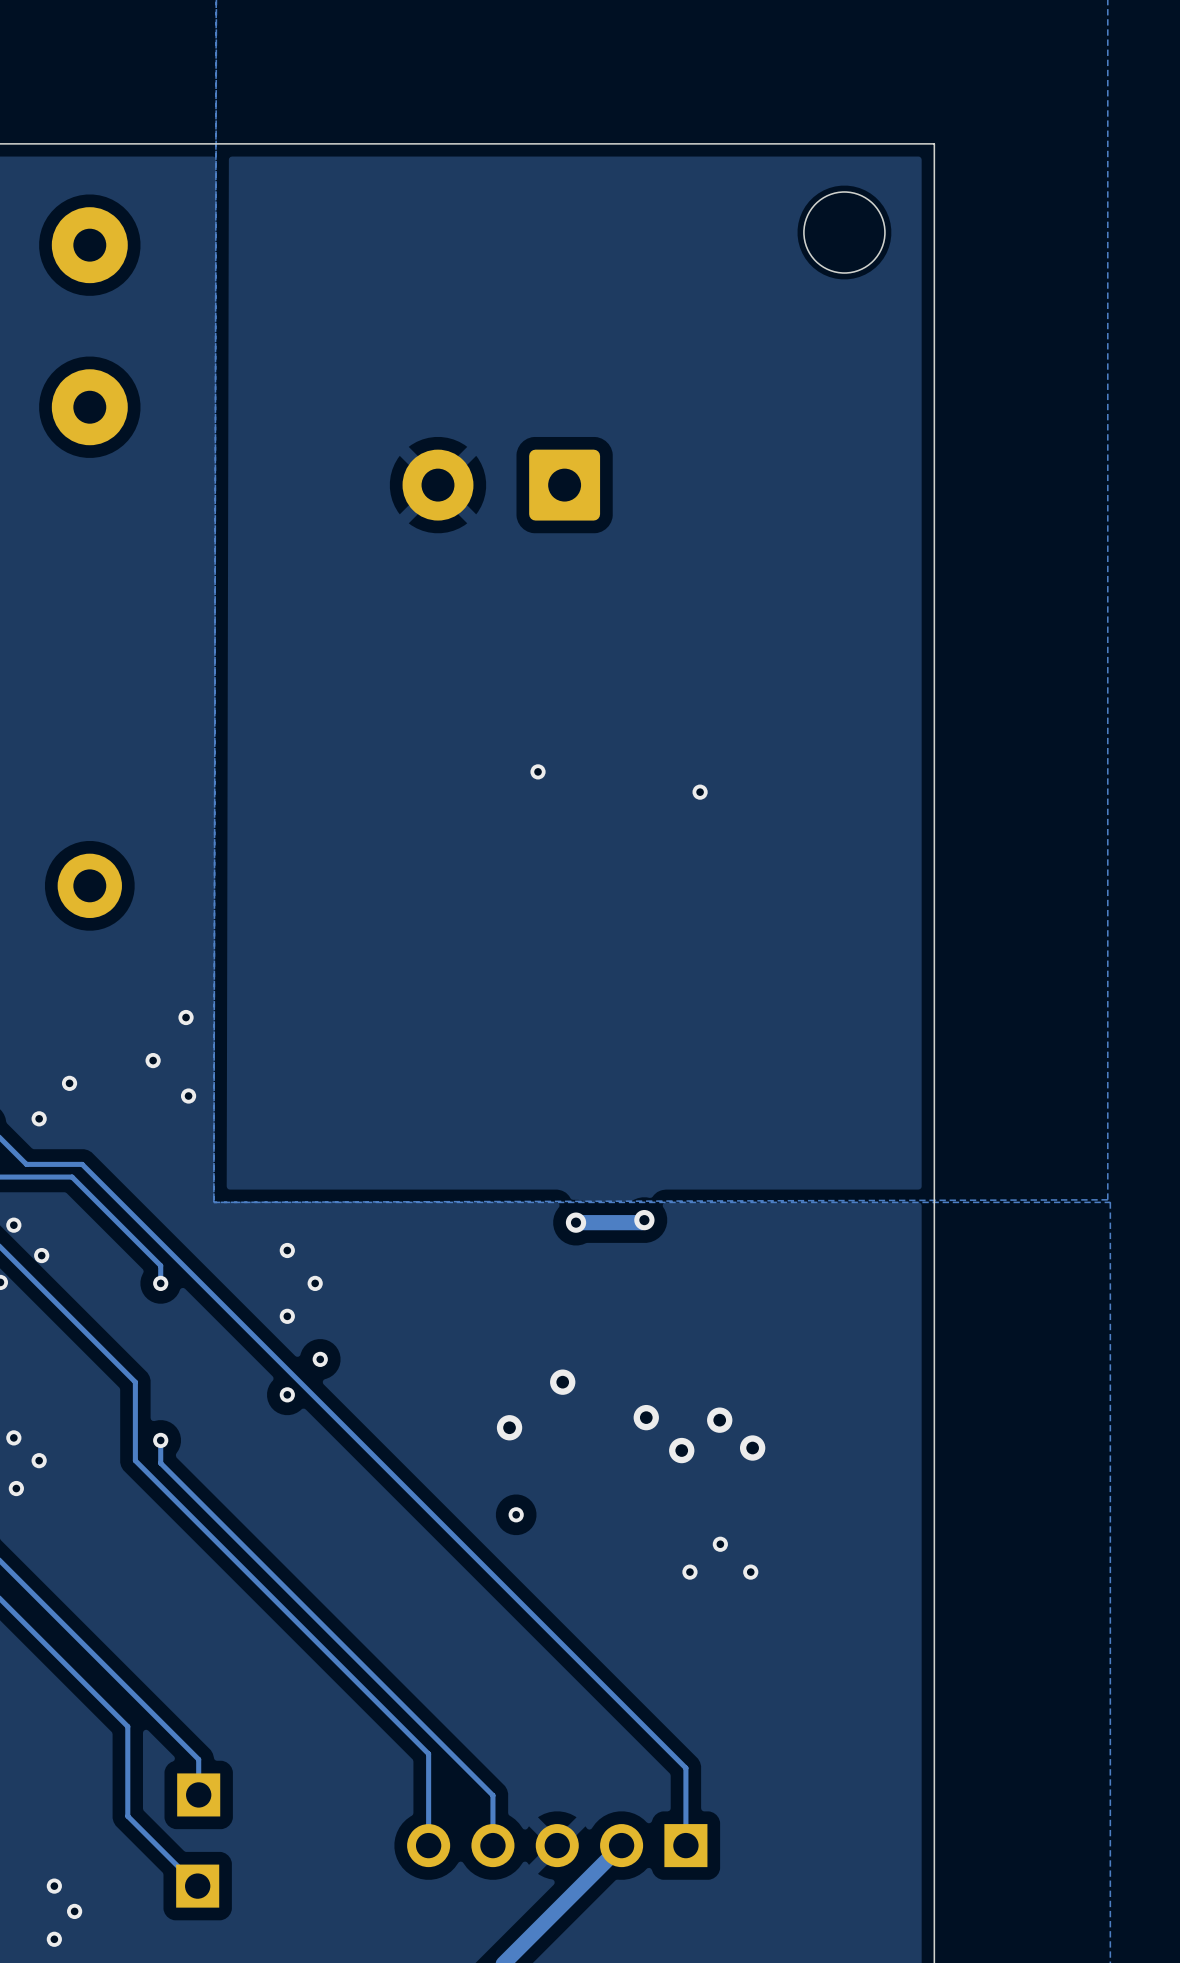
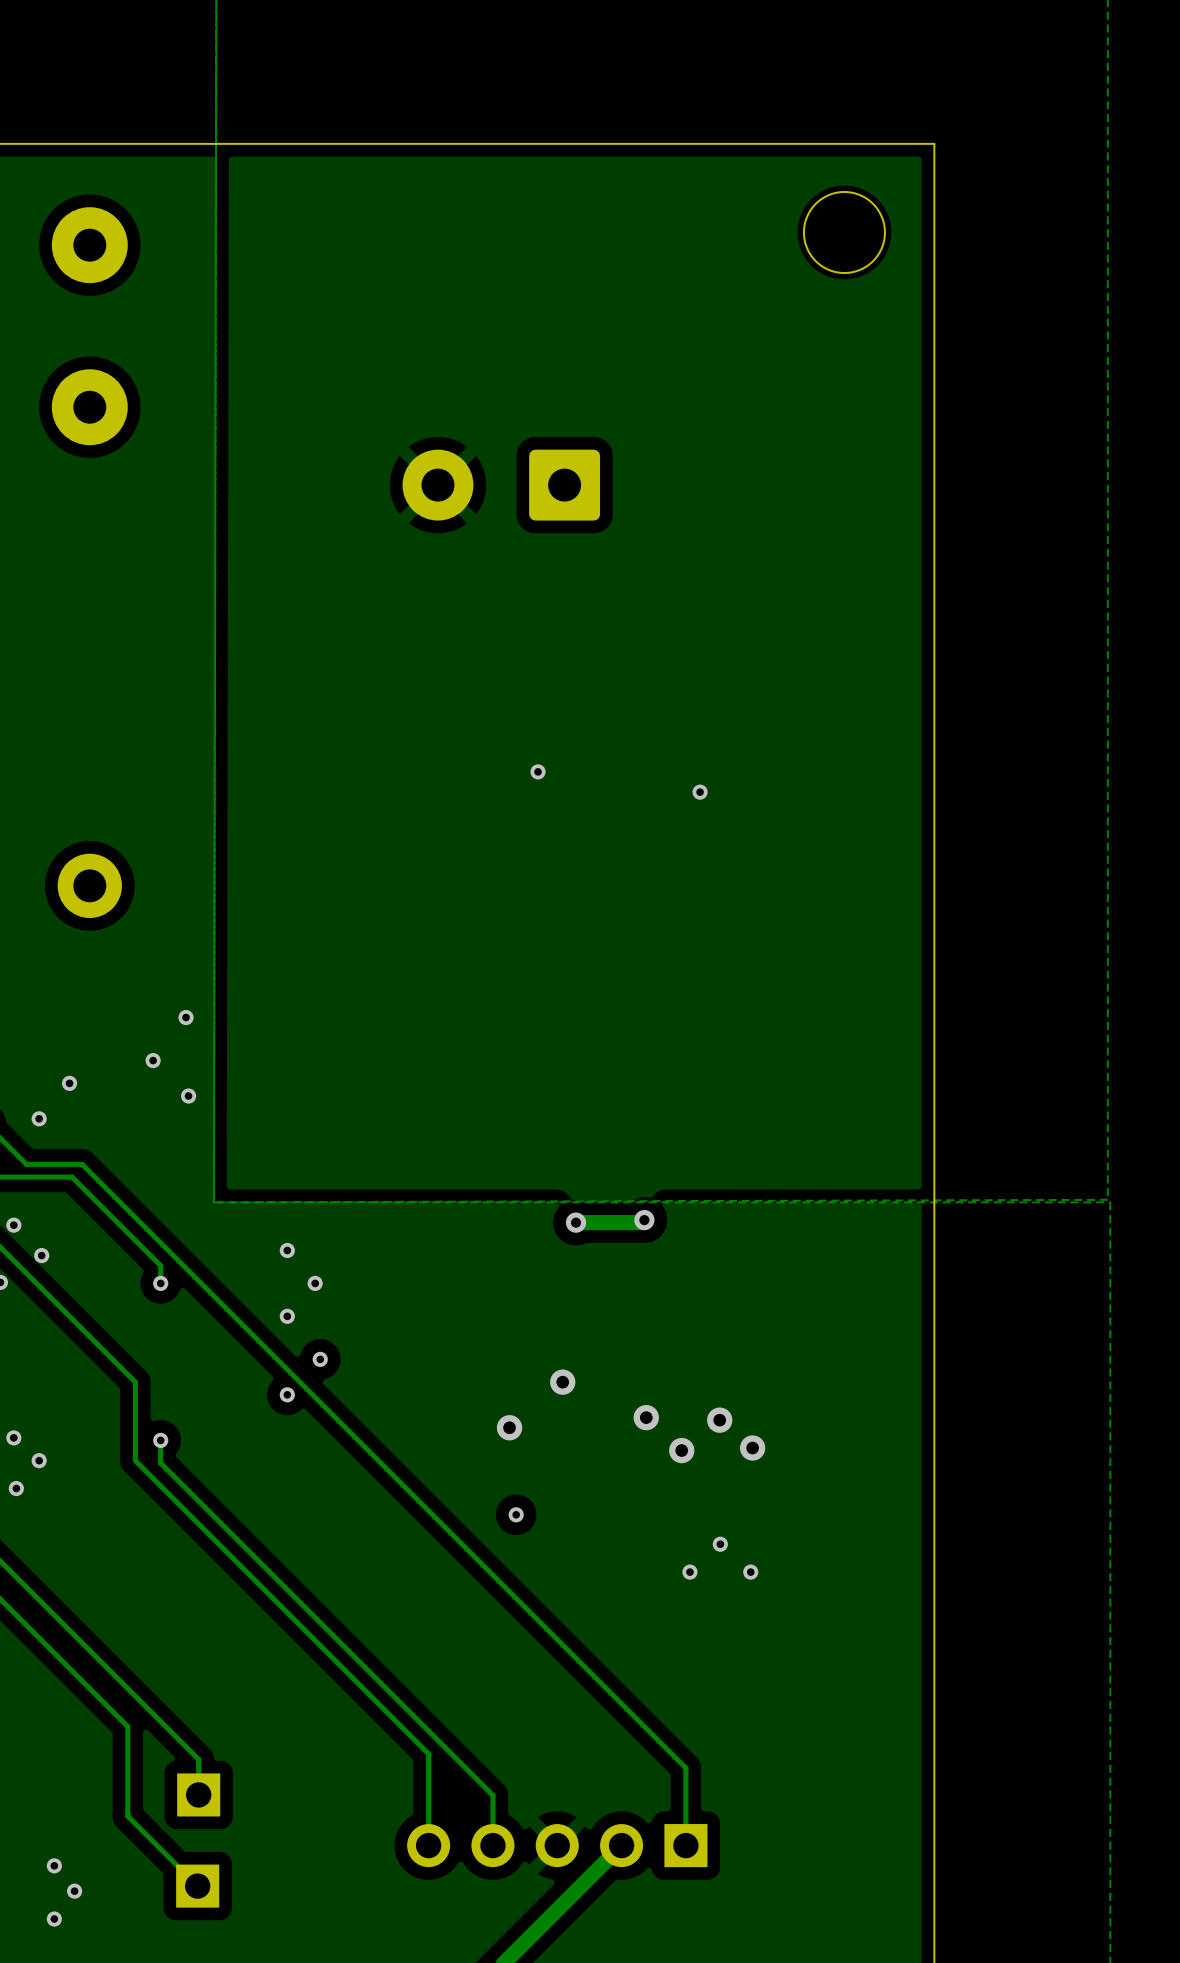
via: none -> (54, 1865)
via: (54, 1886) -> none
via: none -> (74, 1891)
via: (74, 1911) -> none
via: none -> (54, 1919)
via: (54, 1939) -> none

